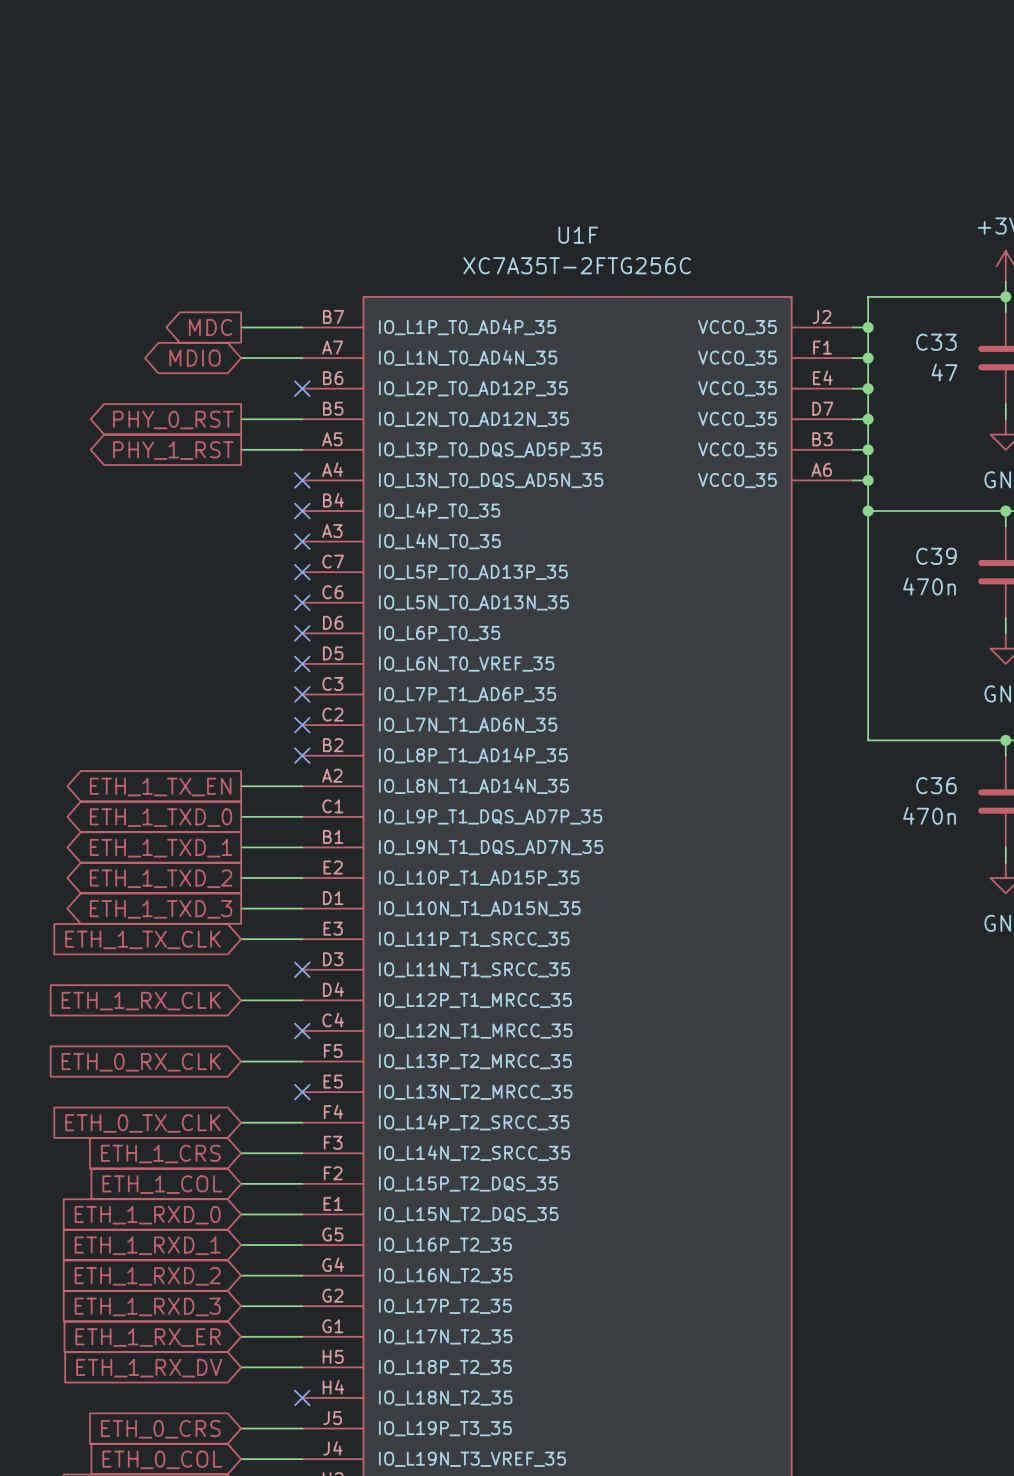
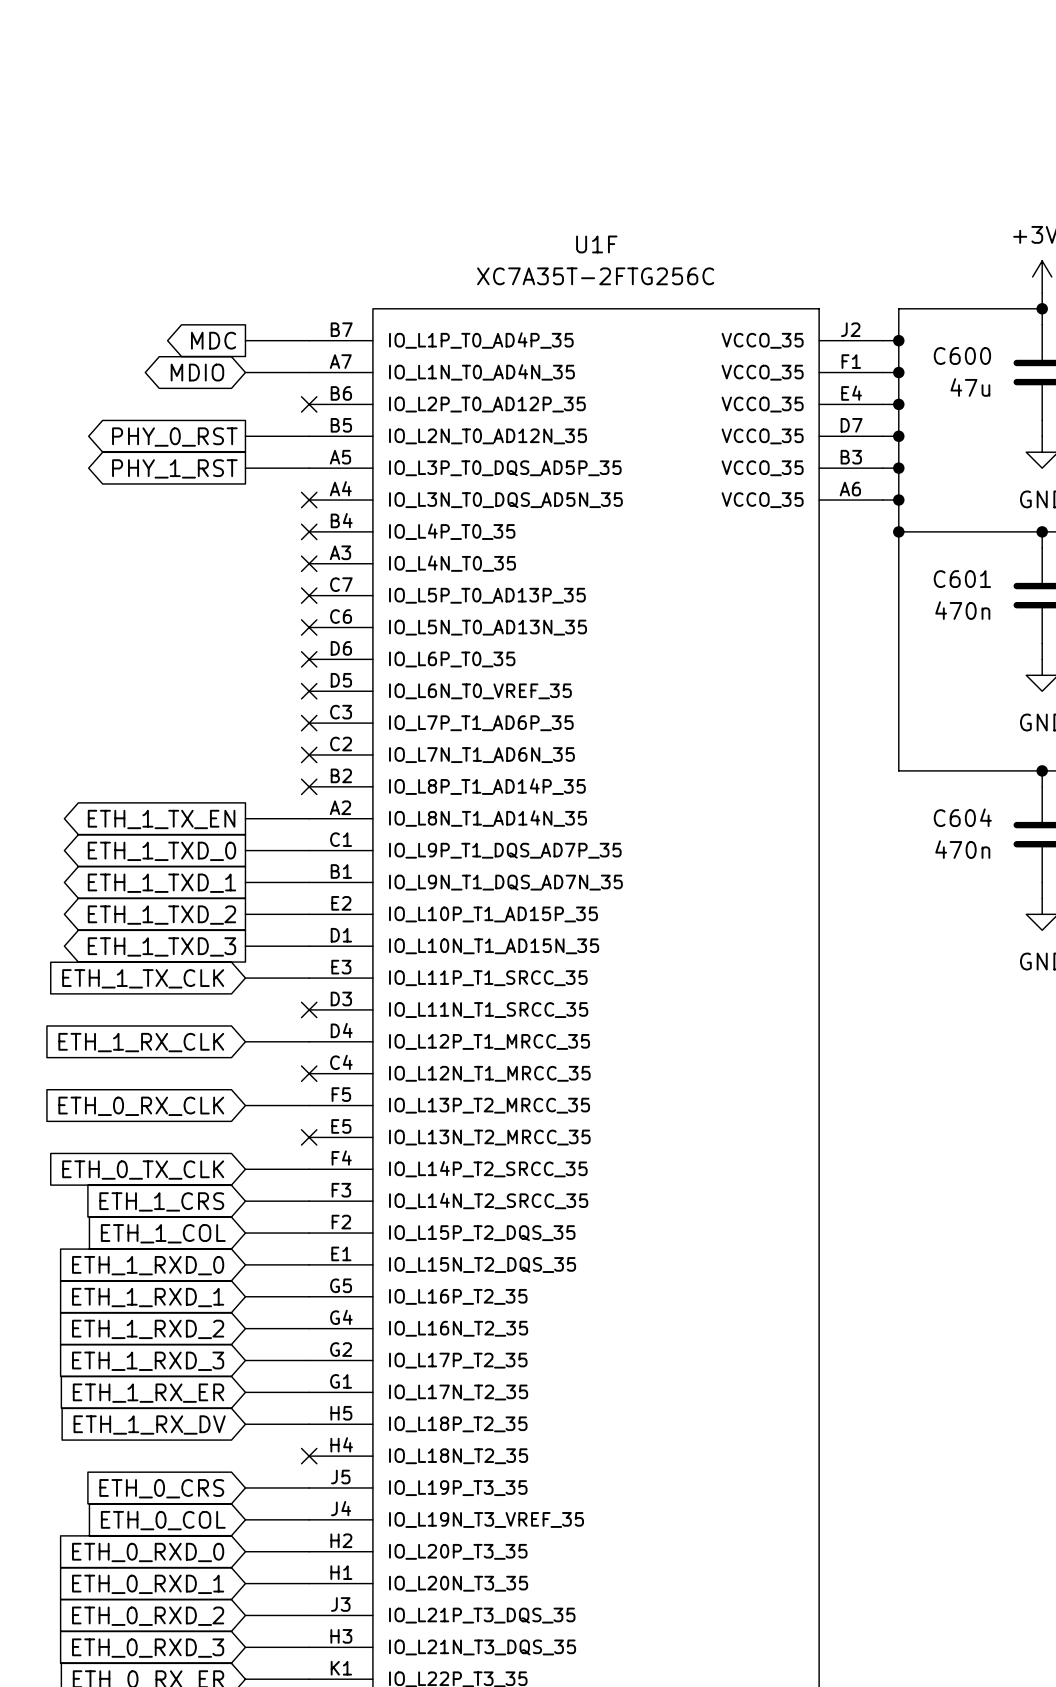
C33 name: C33 (936, 342) -> C600 (962, 356)
C33 value: 47 (944, 372) -> 47u (970, 387)
C39 name: C39 (936, 556) -> C601 (962, 579)
C36 name: C36 (936, 785) -> C604 (962, 817)

